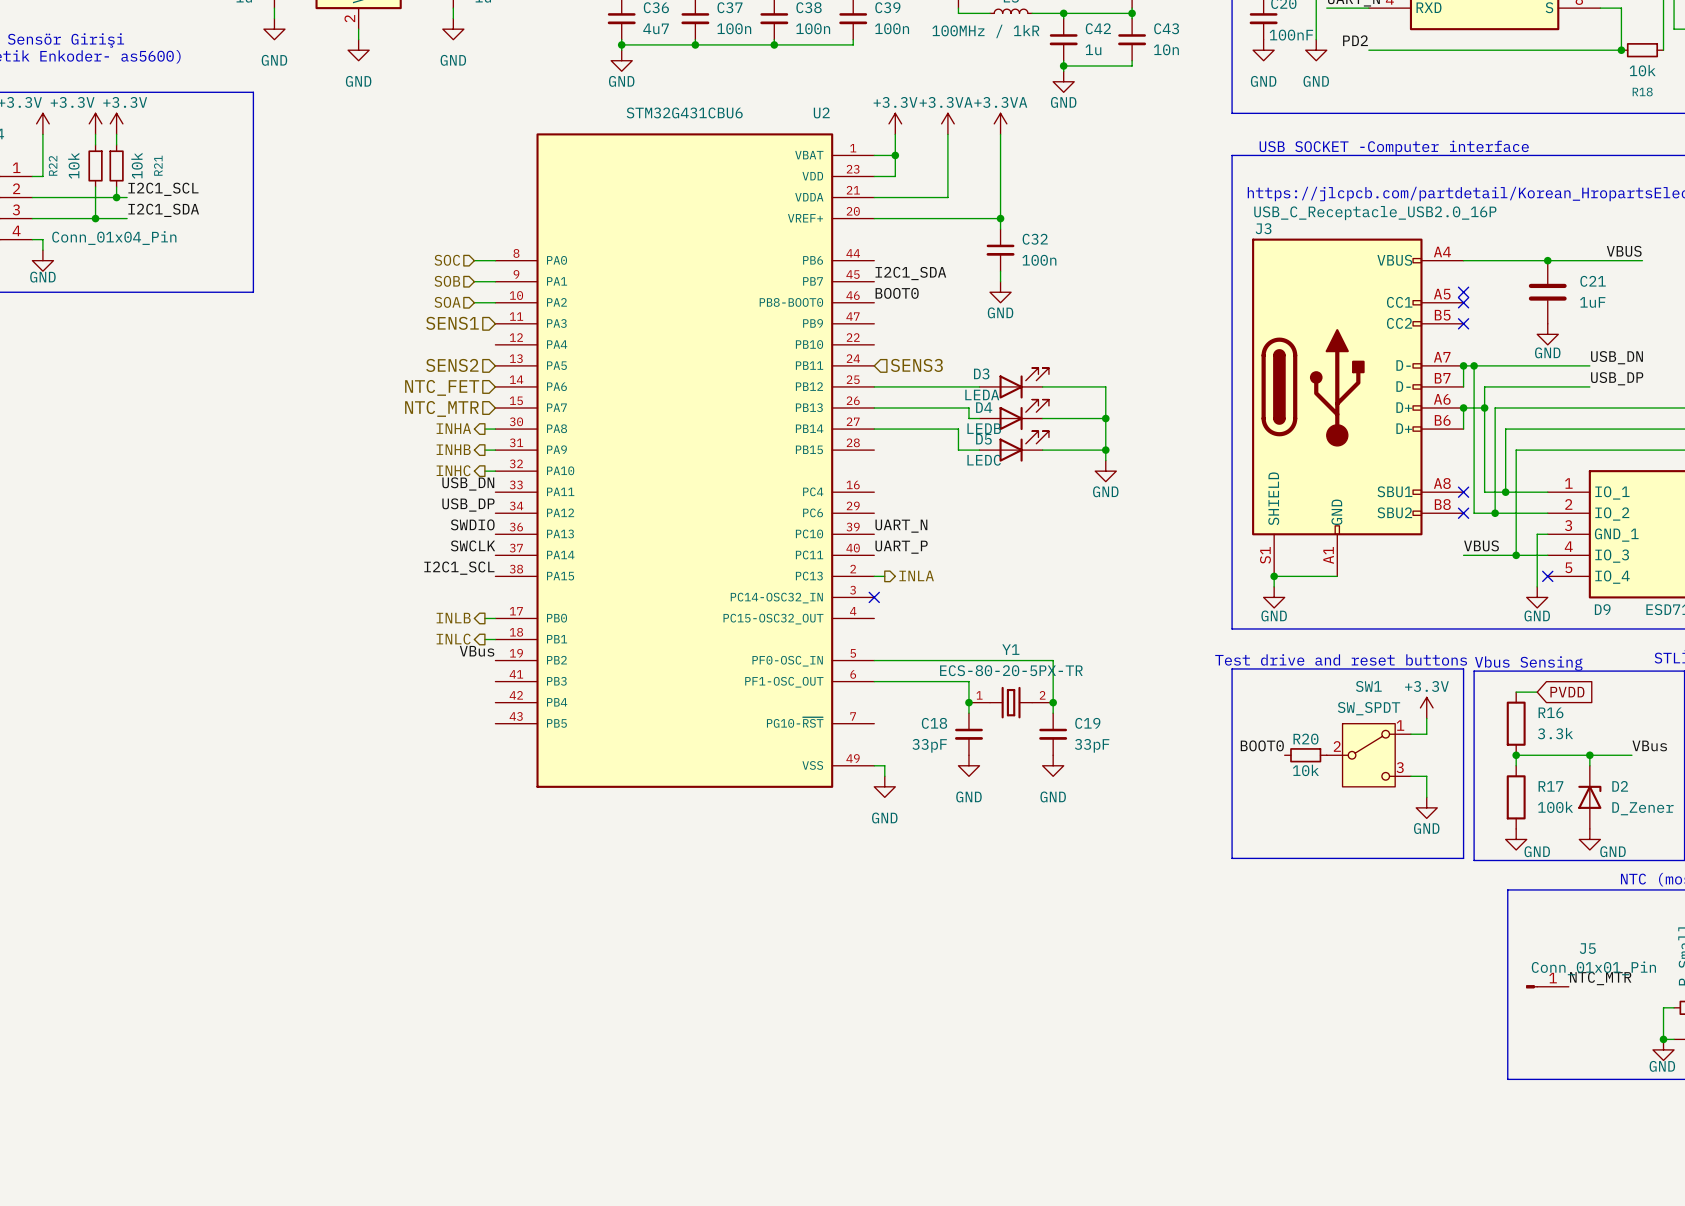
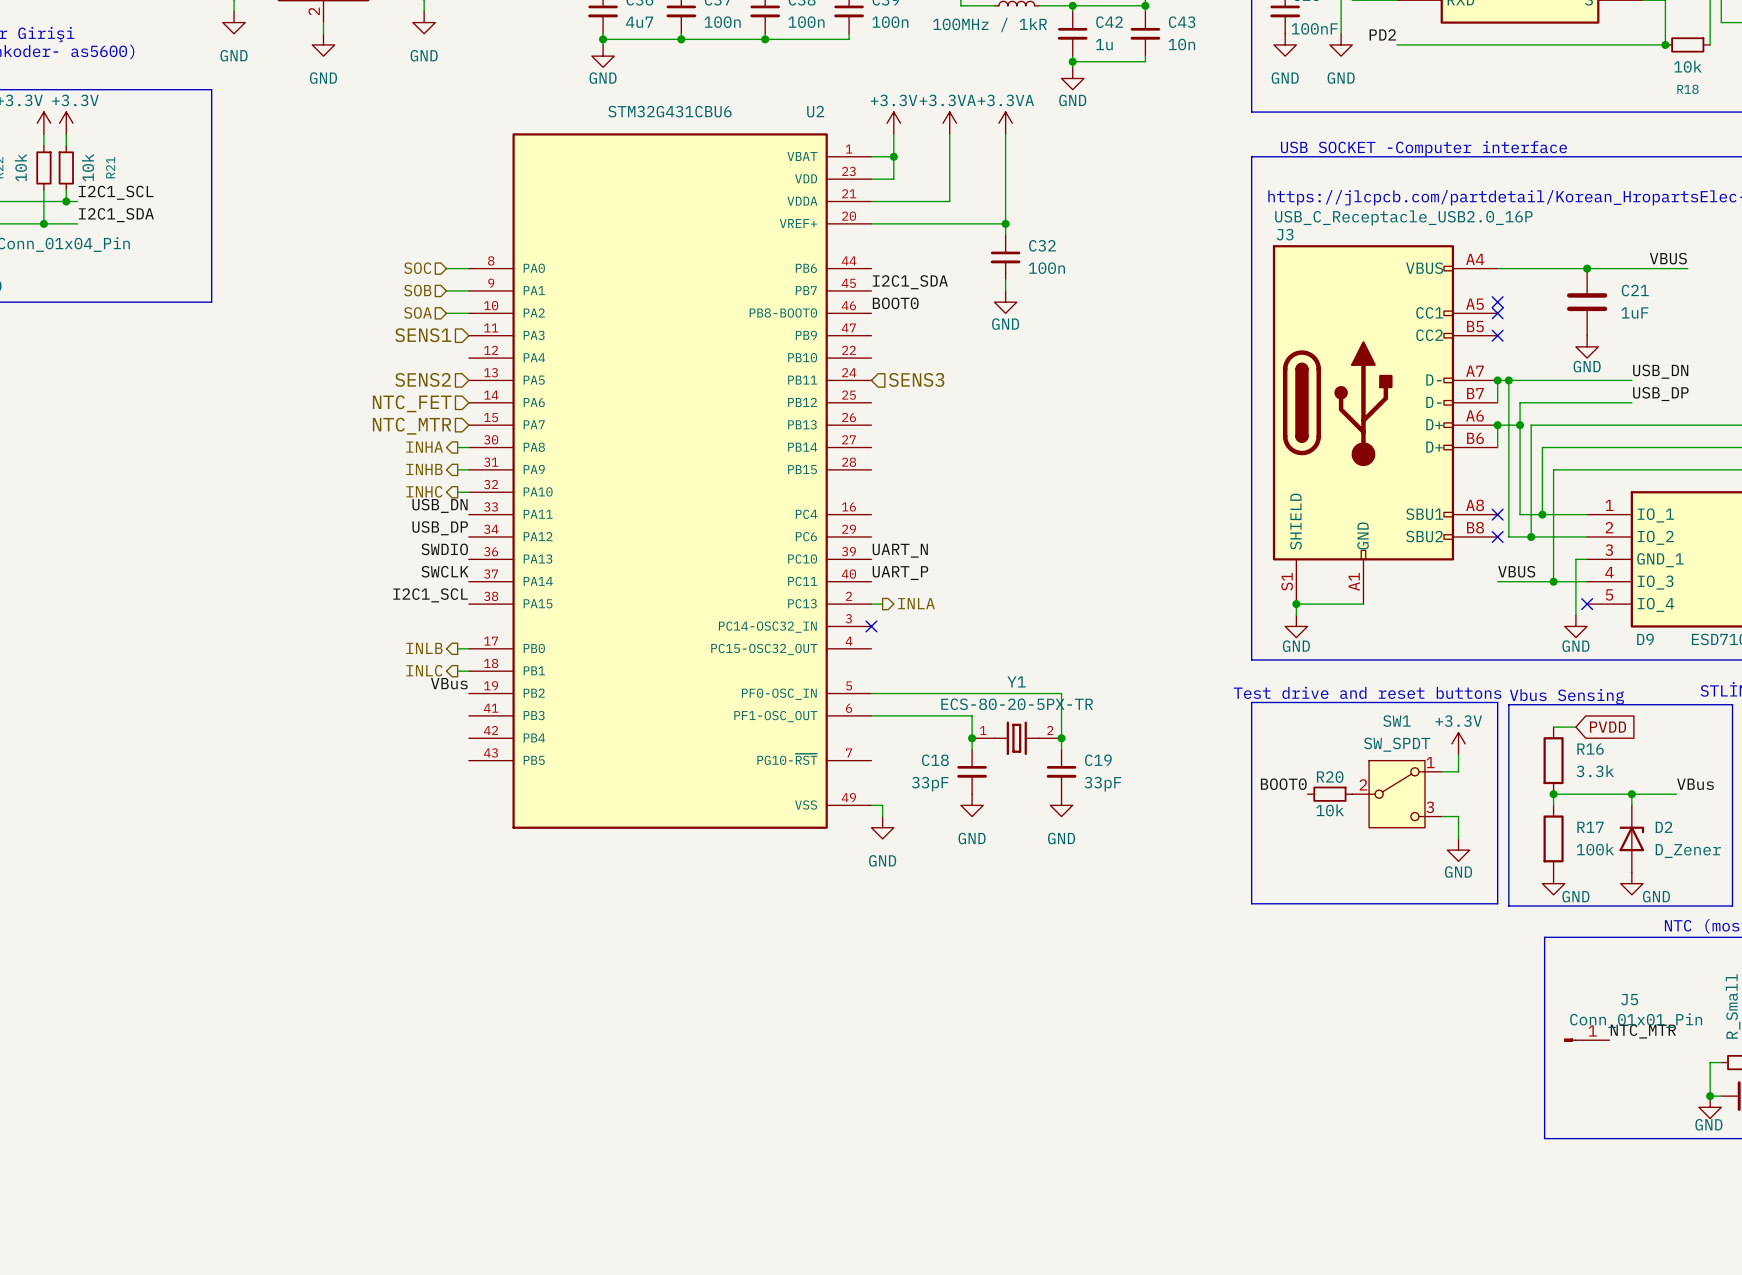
D3: LEDA (1014, 383) -> none
wire: (874, 386) (979, 386) -> none
wire: (1042, 386) (1105, 386) (1105, 460) -> none
wire: (874, 408) (968, 408) (968, 418) (979, 418) -> none
D4: LEDB (1014, 414) -> none
wire: (1042, 418) (1105, 418) -> none
junction: (1105, 418) -> none
wire: (874, 429) (958, 429) (958, 450) (979, 450) -> none
D5: LEDC (1014, 446) -> none
wire: (1042, 450) (1105, 450) -> none
junction: (1105, 450) -> none
power symbol: GND (1105, 471) -> none

